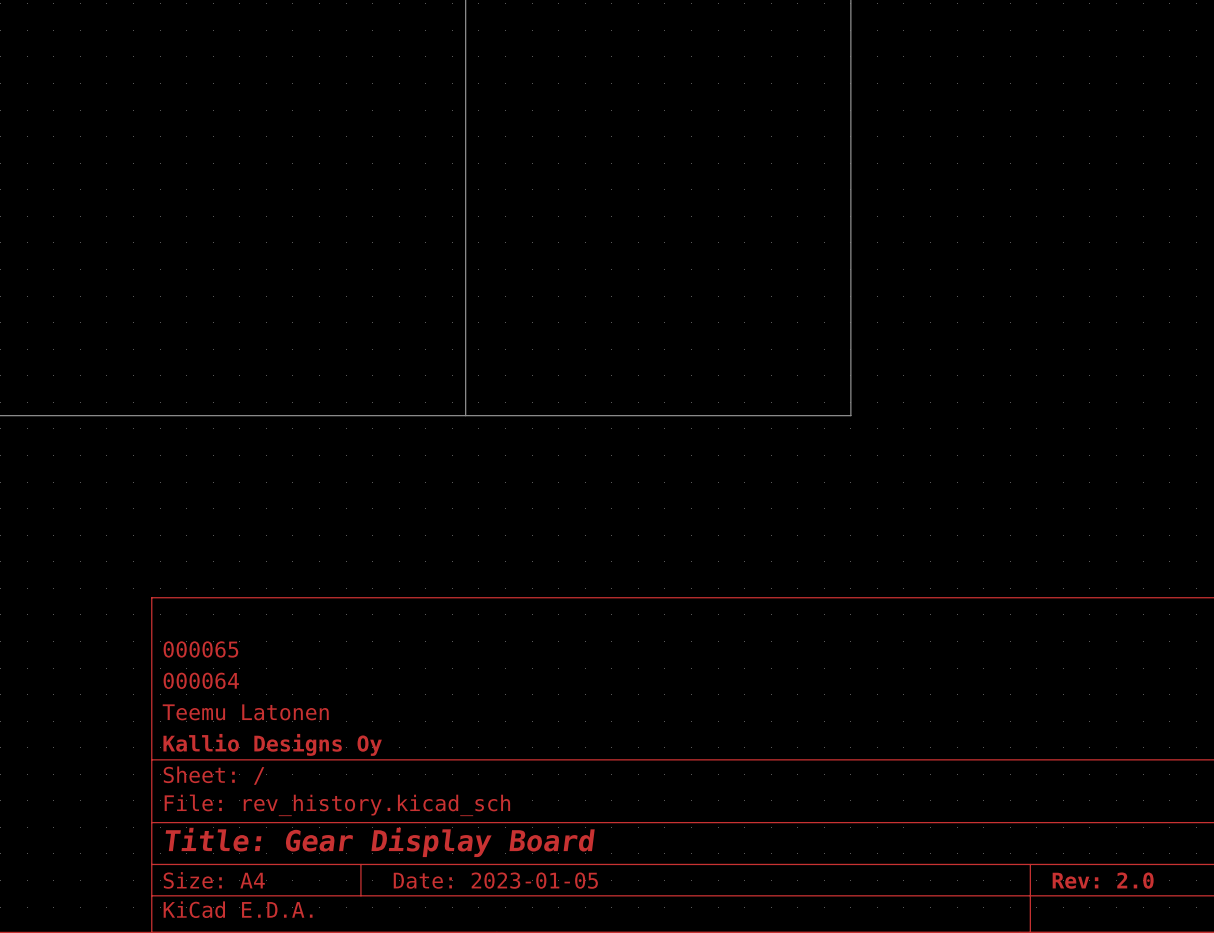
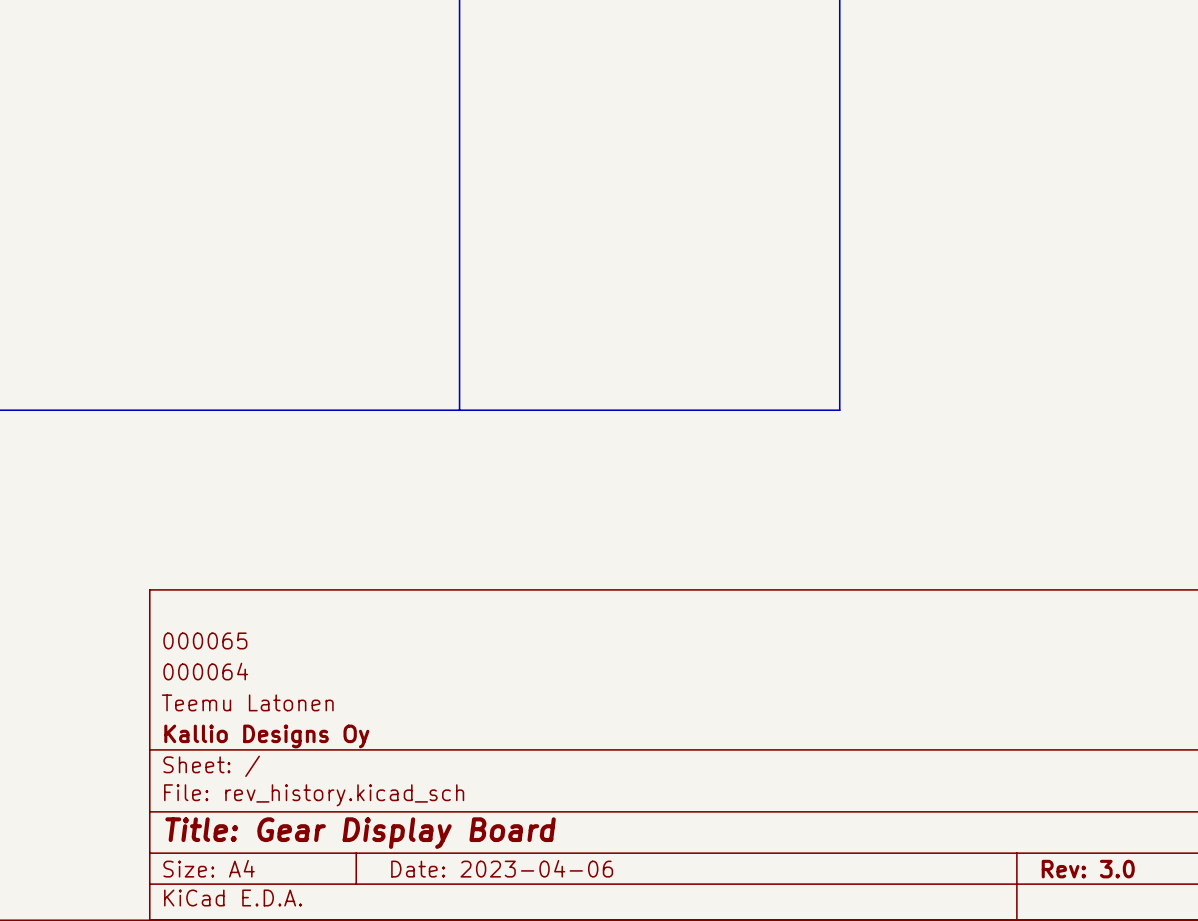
title block: Date: 2023-01-05 (495, 880) -> Date: 2023-04-06 (502, 868)
title block: Rev: 2.0 (1103, 880) -> Rev: 3.0 (1088, 869)

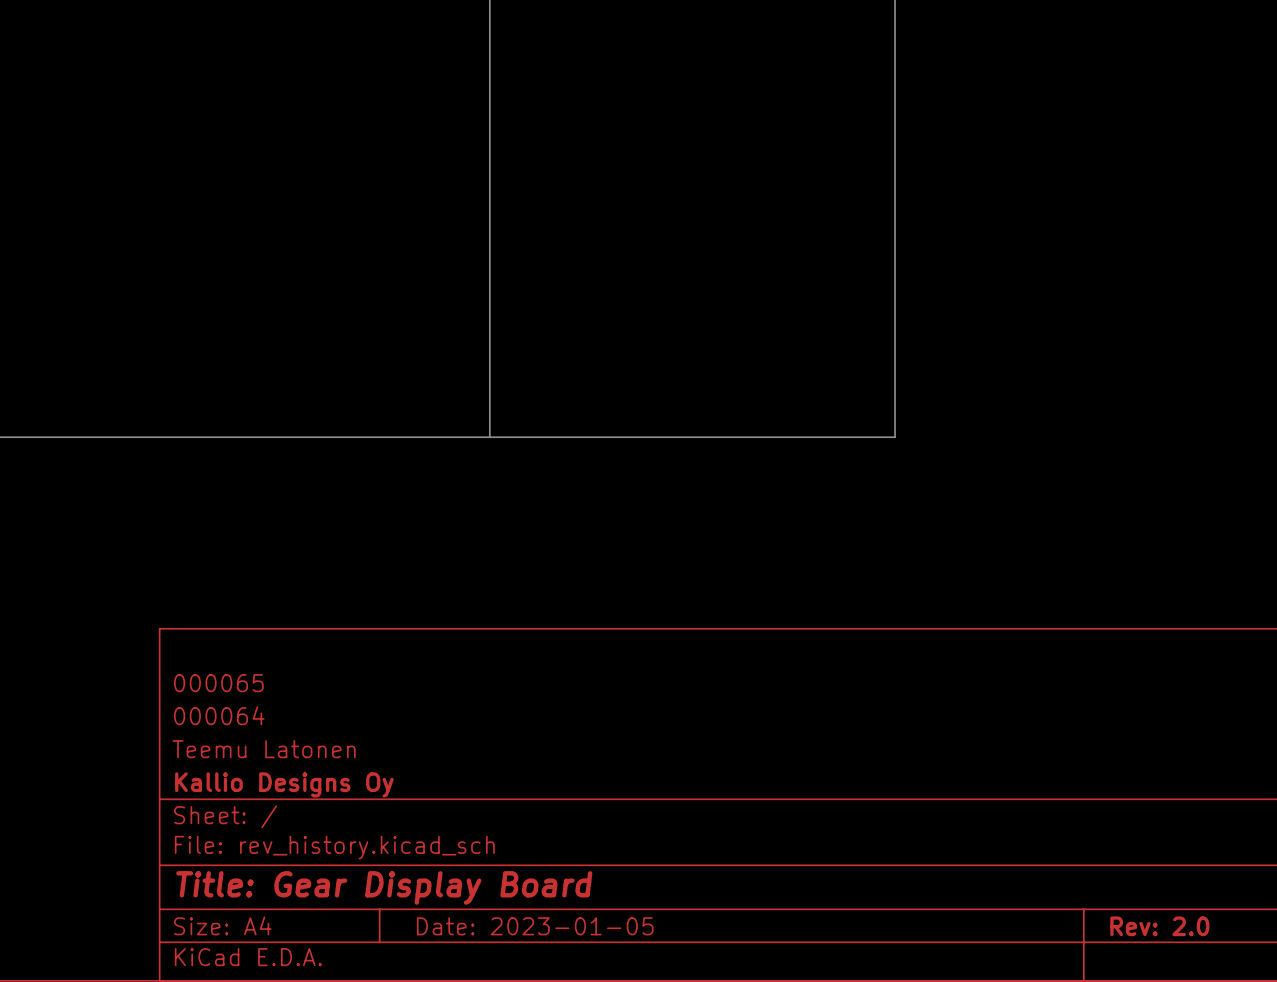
title block: Date: 2023-04-06 (502, 868) -> Date: 2023-01-05 (535, 926)
title block: Rev: 3.0 (1088, 869) -> Rev: 2.0 (1159, 926)

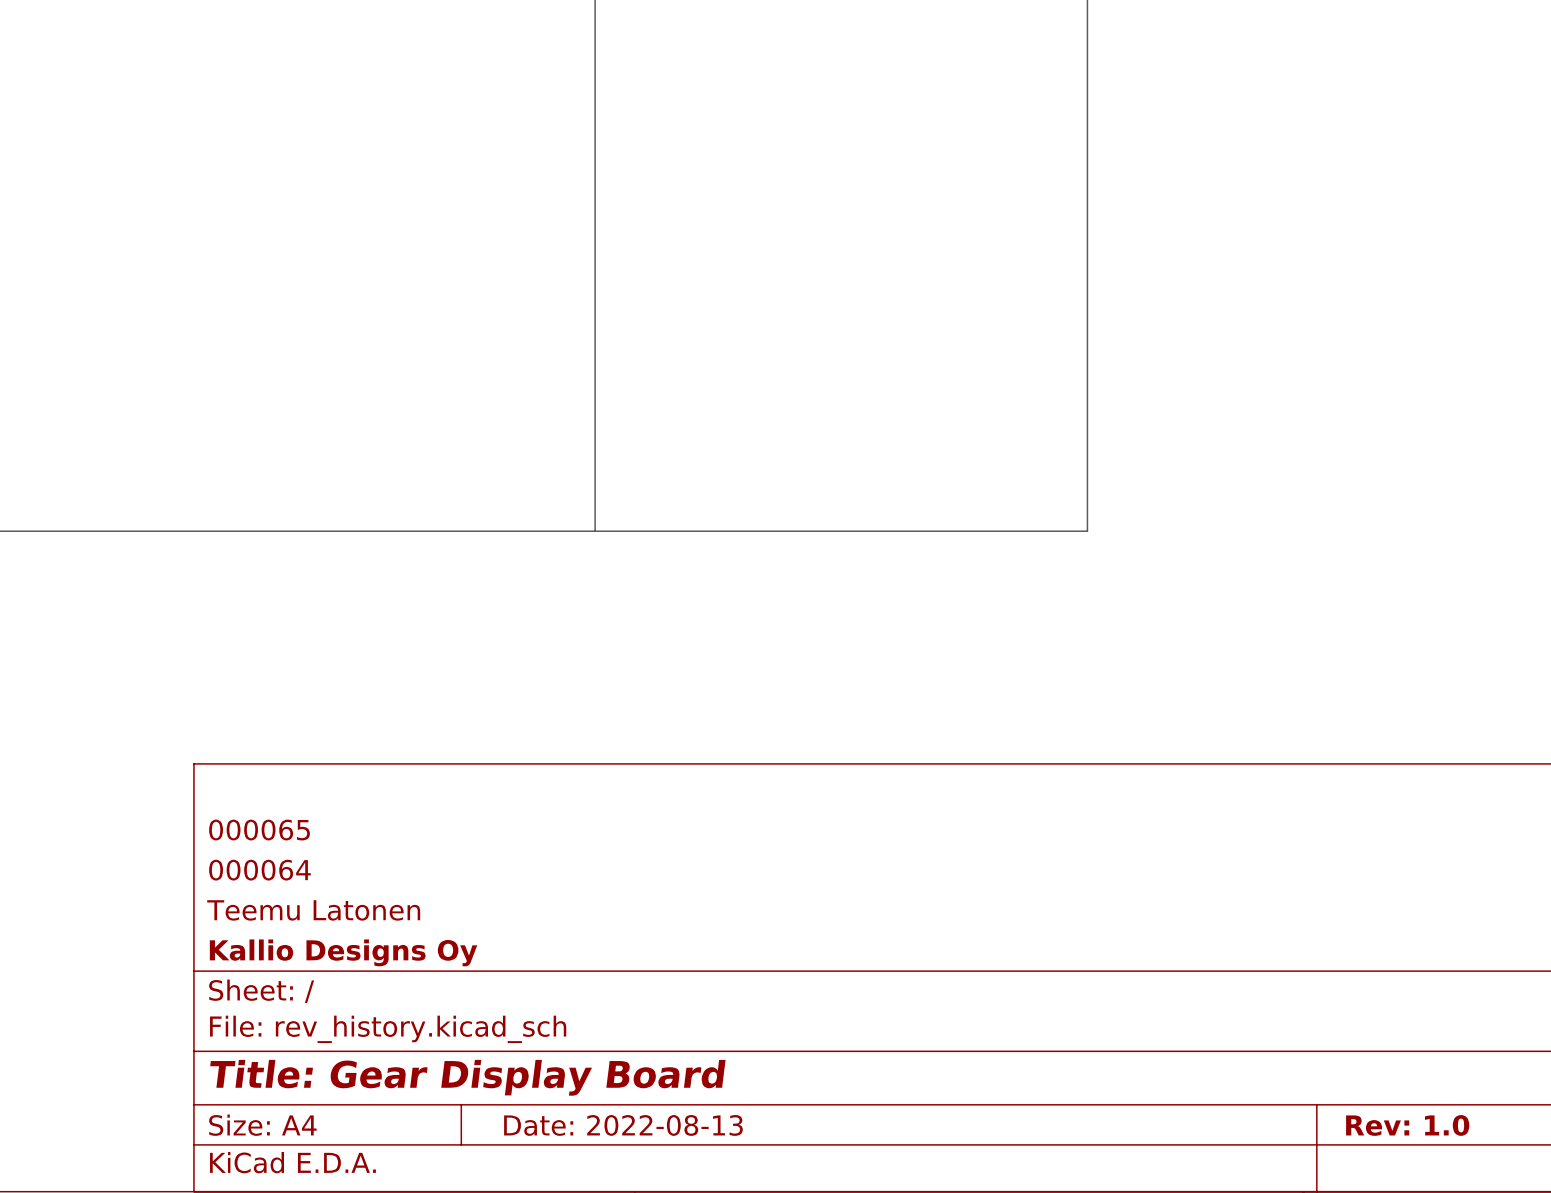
title block: Date: 2023-01-05 (535, 926) -> Date: 2022-08-13 (623, 1125)
title block: Rev: 2.0 (1159, 926) -> Rev: 1.0 (1407, 1125)

